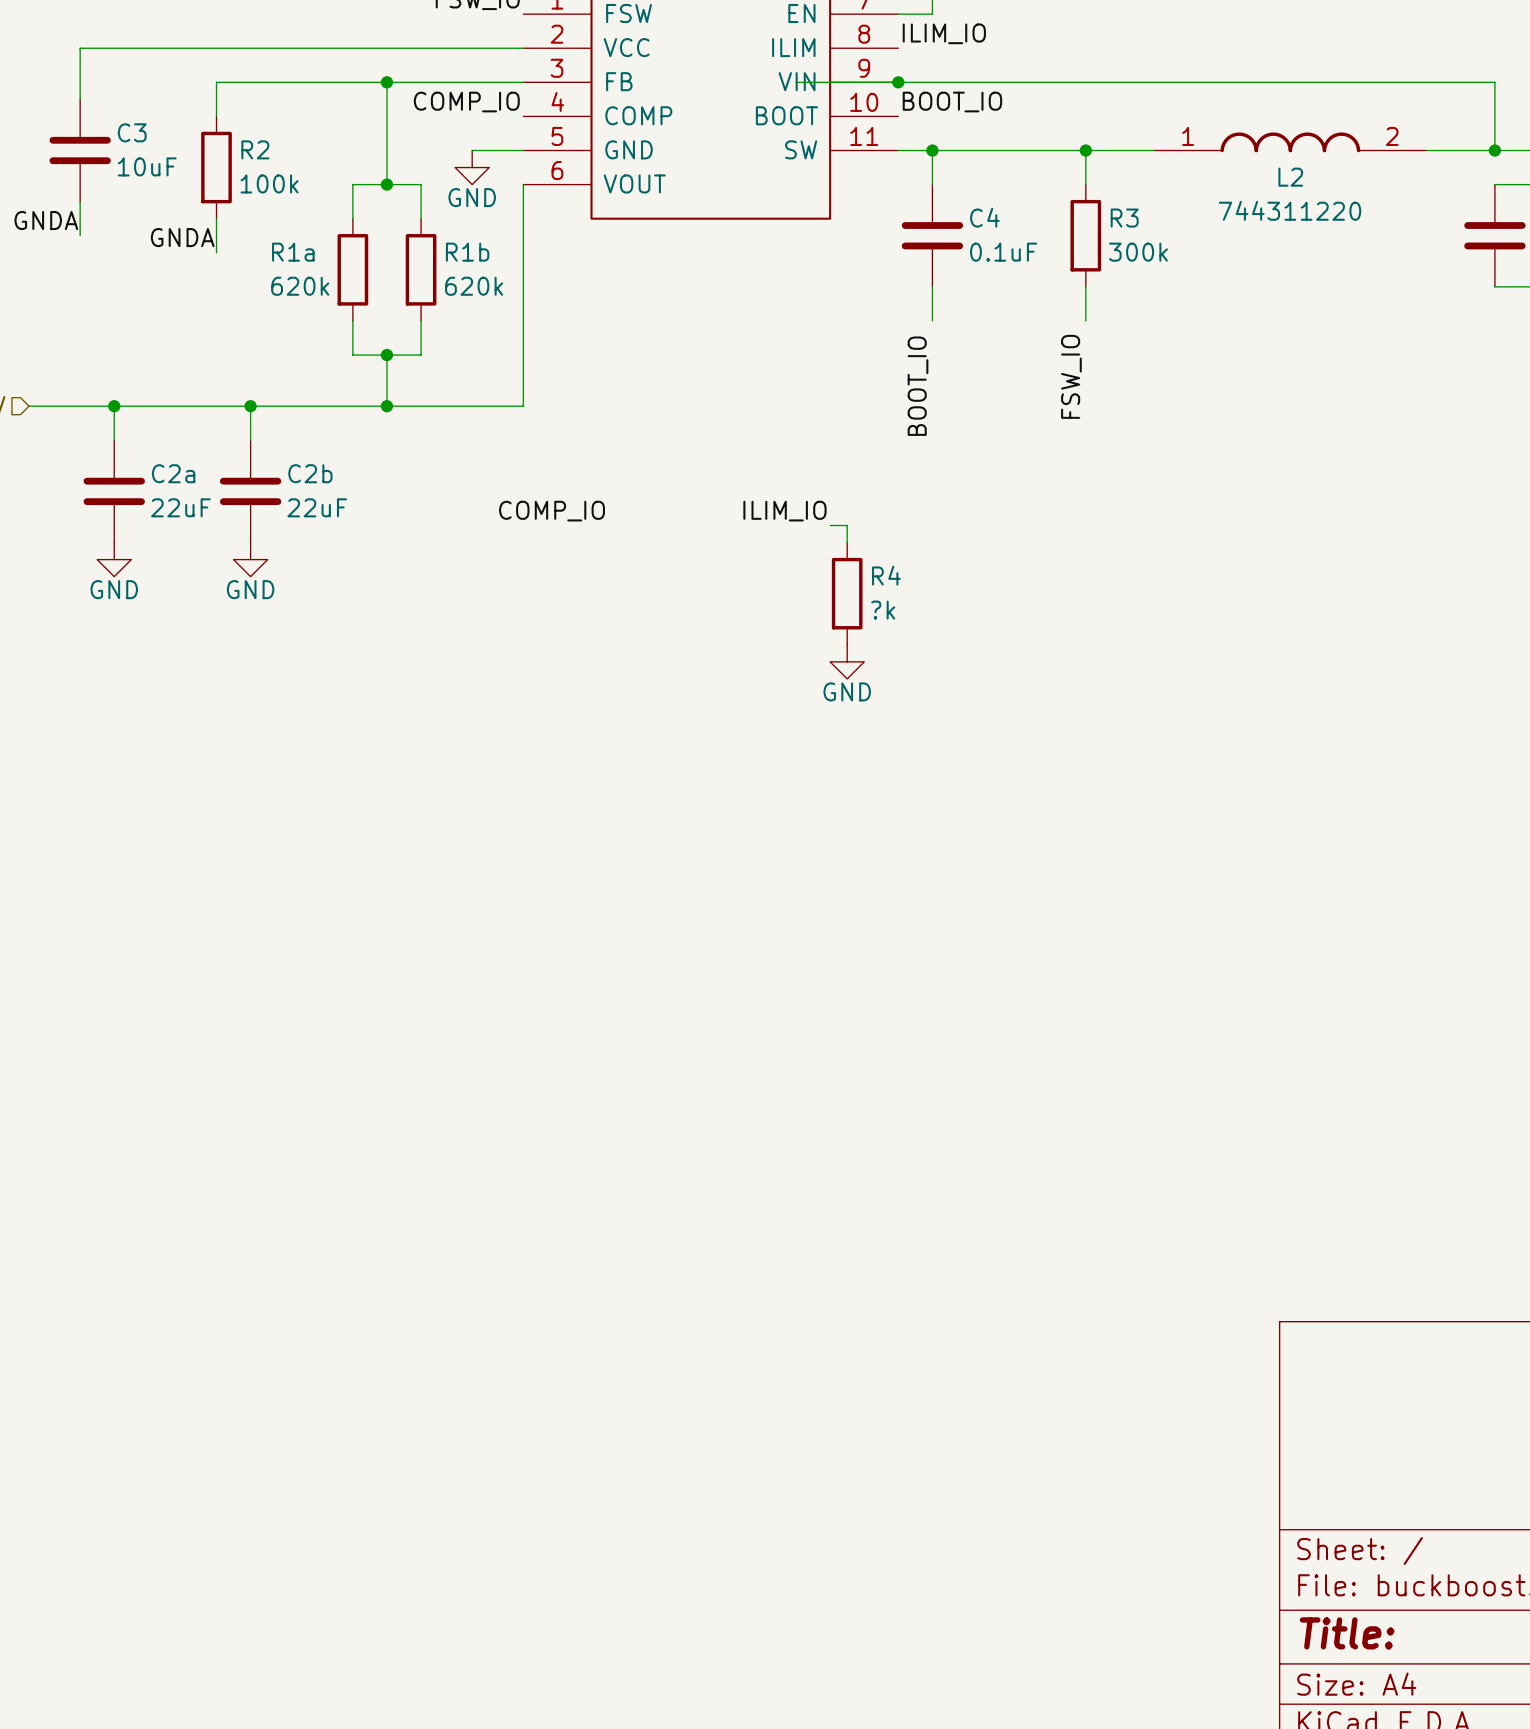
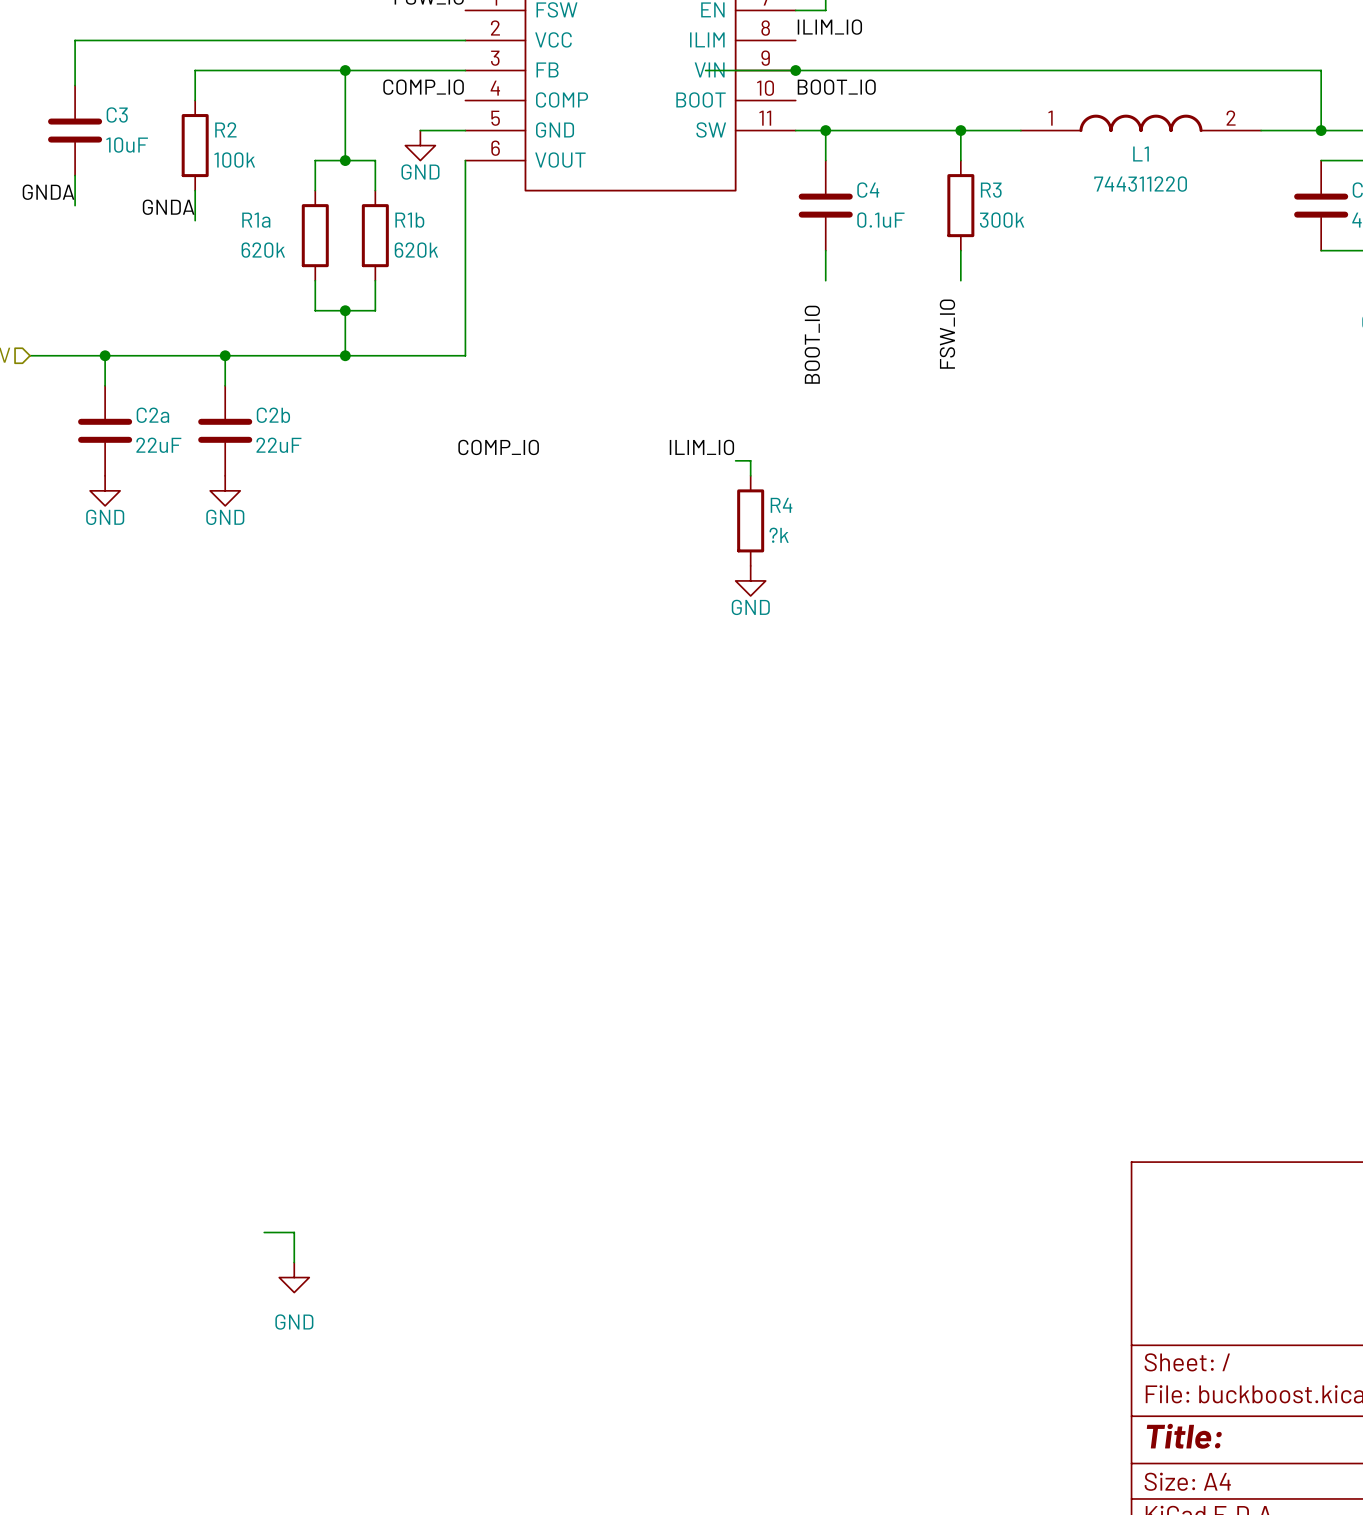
L2 name: L2 (1290, 177) -> L1 (1141, 154)
wire: none -> (264, 1232) (294, 1232) (294, 1262)
power symbol: none -> GND (294, 1277)

